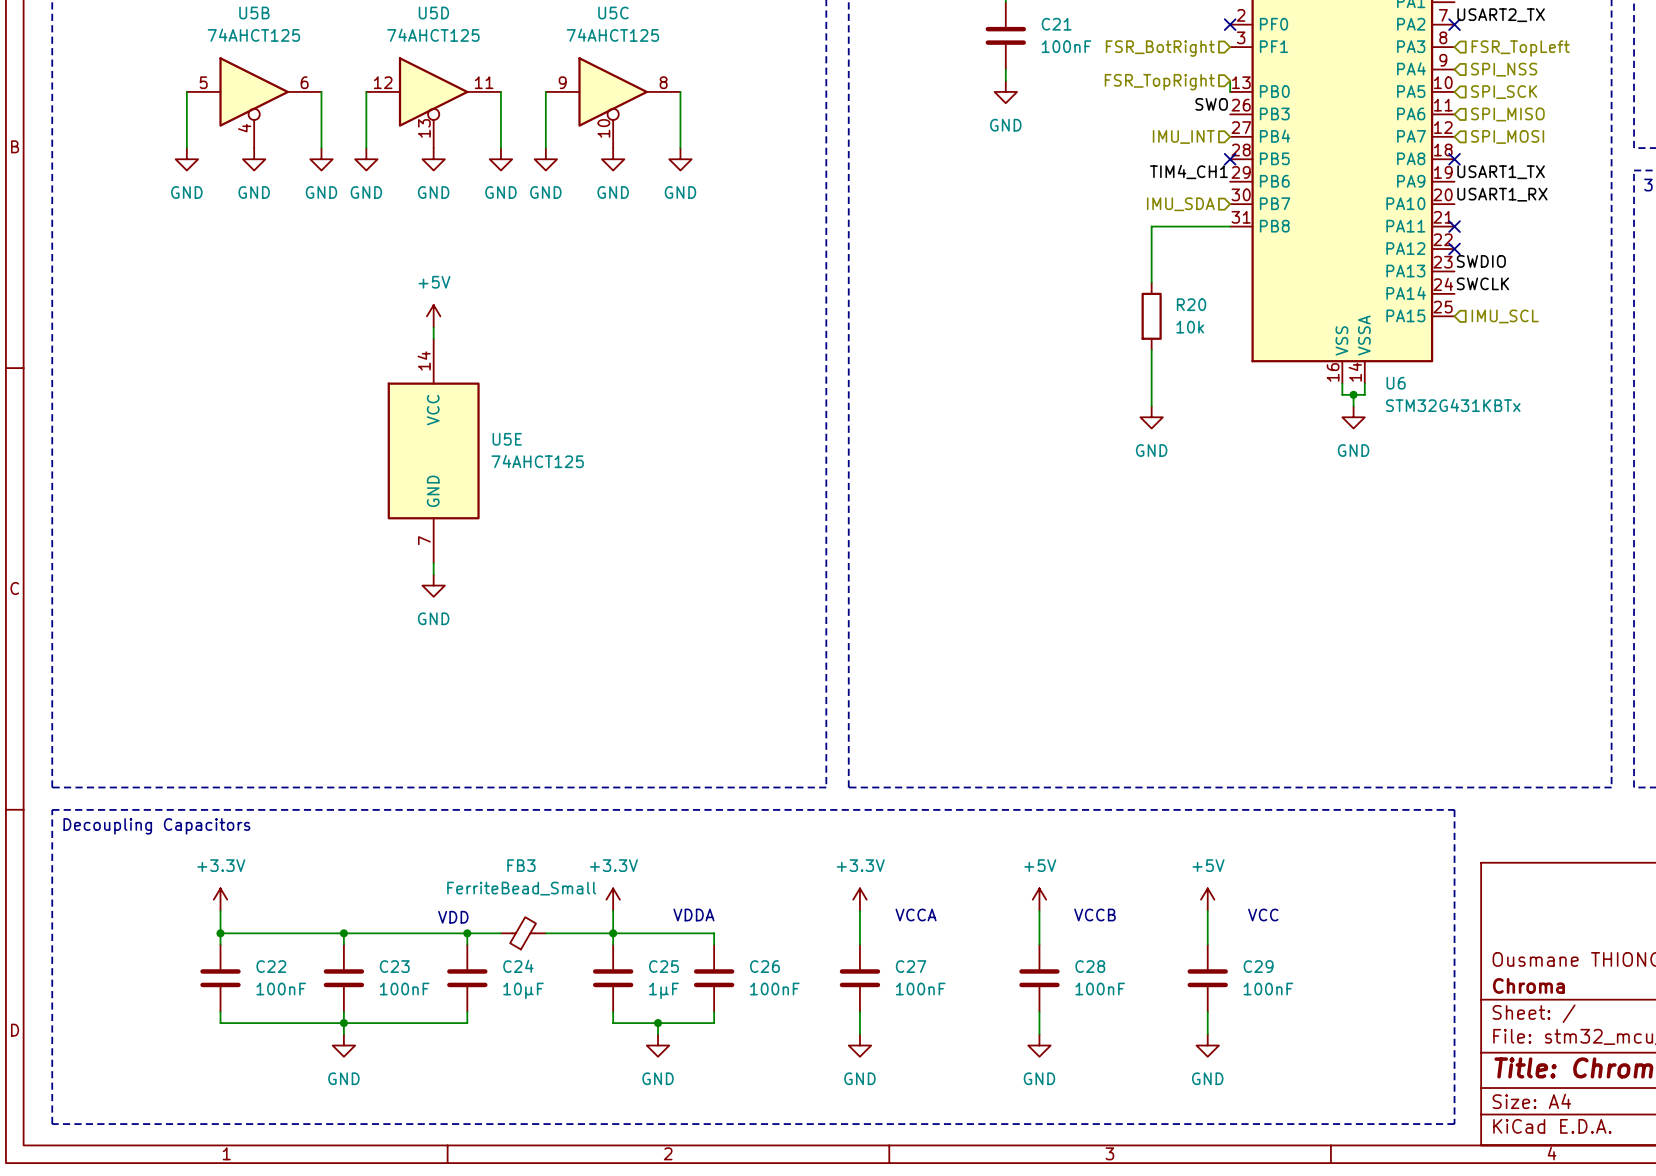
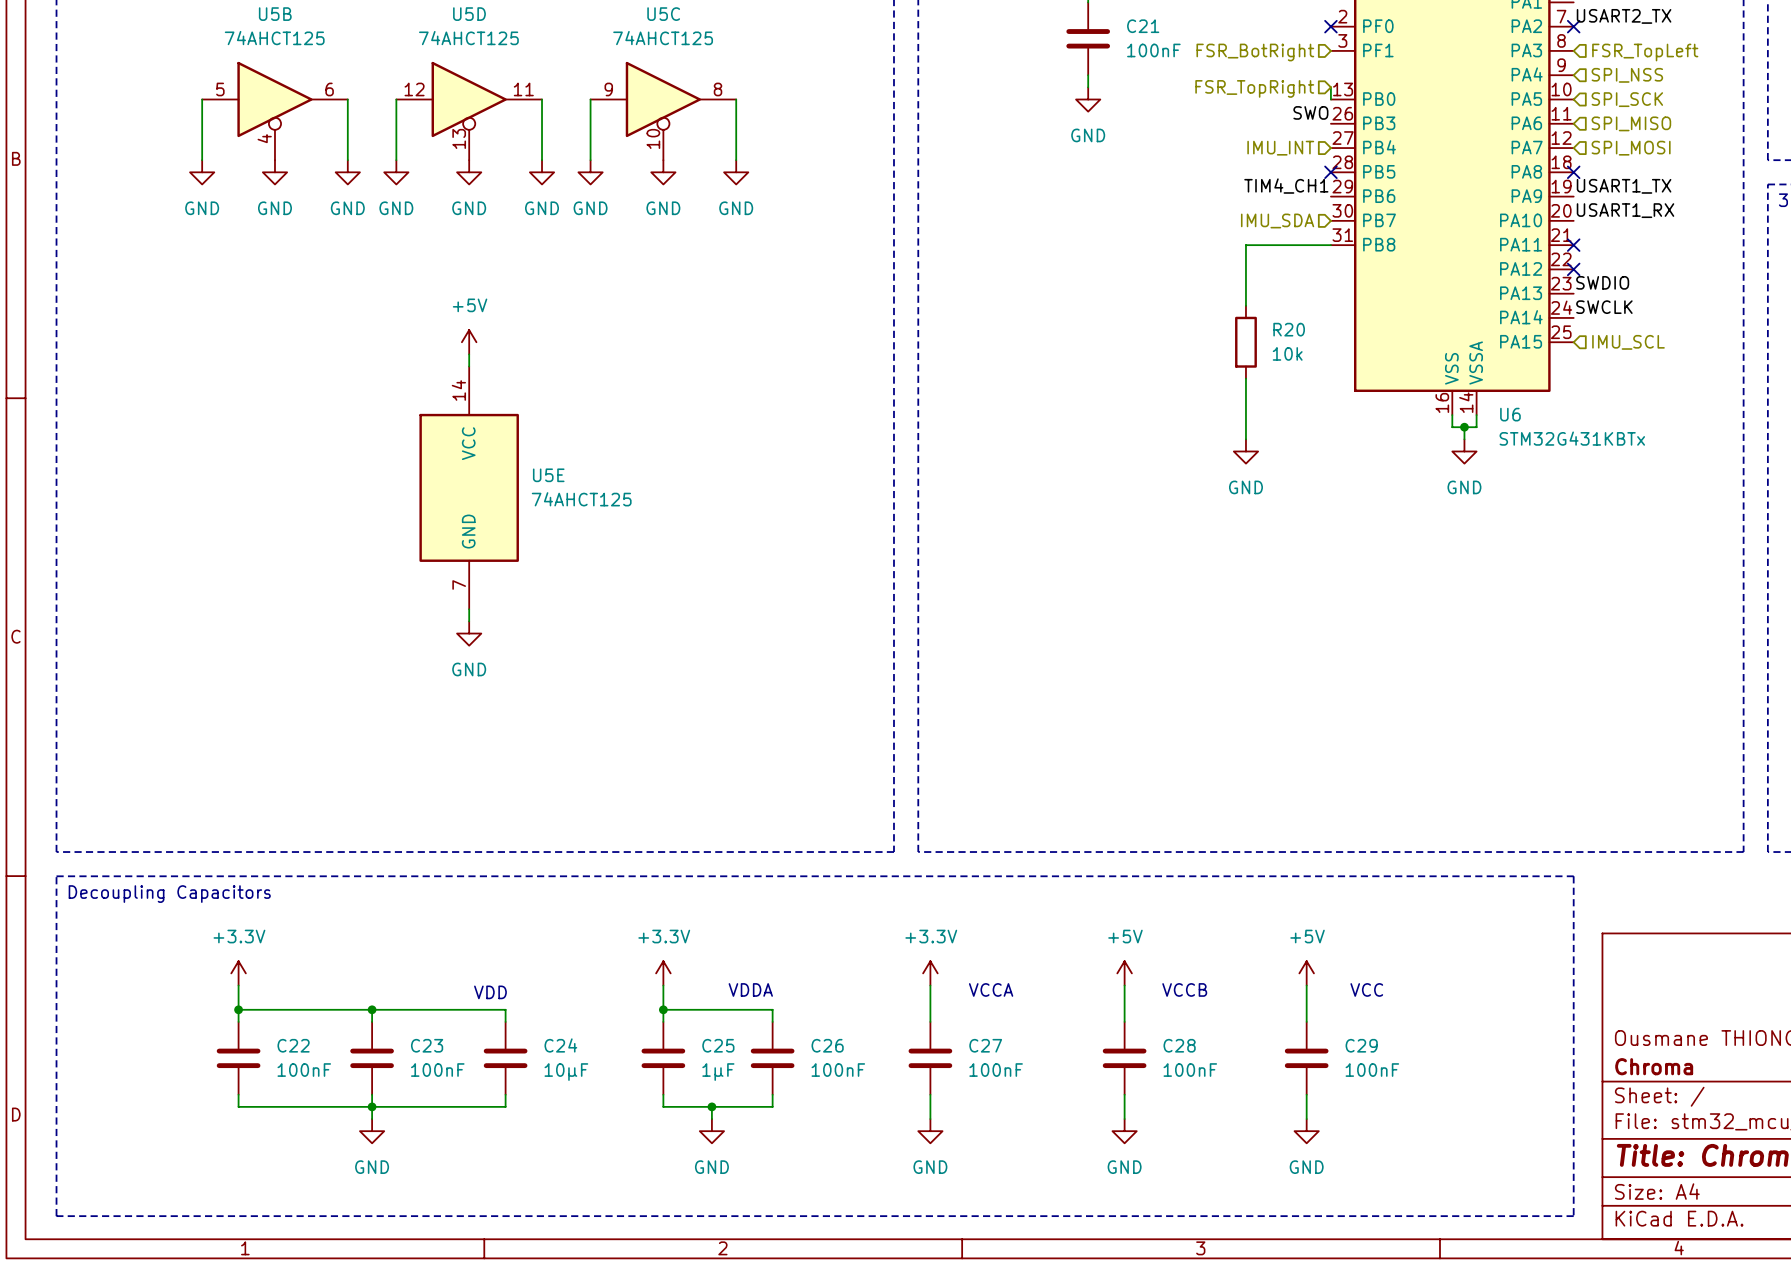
wire: (467, 933) (500, 933) -> none
junction: (467, 933) -> none
FB3: FerriteBead_Small (523, 933) -> none
wire: (545, 933) (613, 933) -> none

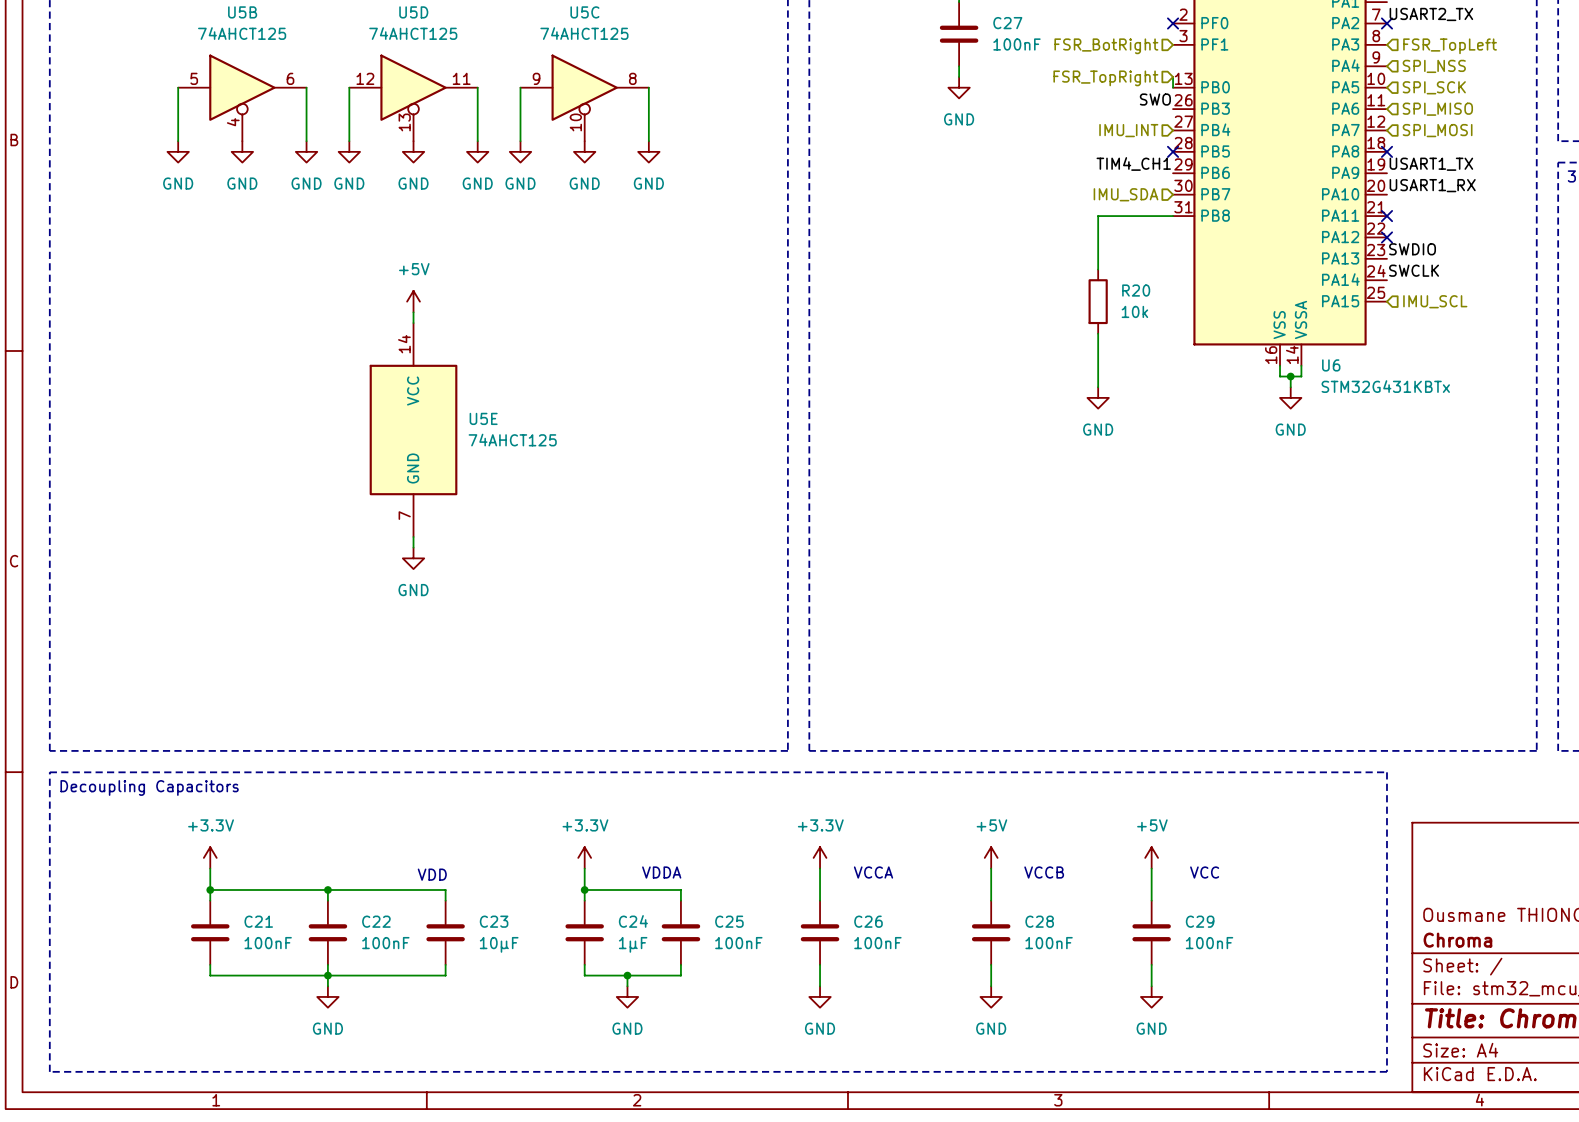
C21 name: C21 (1143, 26) -> C27 (1007, 23)
C22 name: C22 (293, 1045) -> C21 (258, 921)
C23 name: C23 (427, 1045) -> C22 (376, 921)
C24 name: C24 (560, 1045) -> C23 (494, 921)
C25 name: C25 (718, 1045) -> C24 (633, 921)
C26 name: C26 (827, 1045) -> C25 (729, 921)
C27 name: C27 (985, 1045) -> C26 (868, 921)

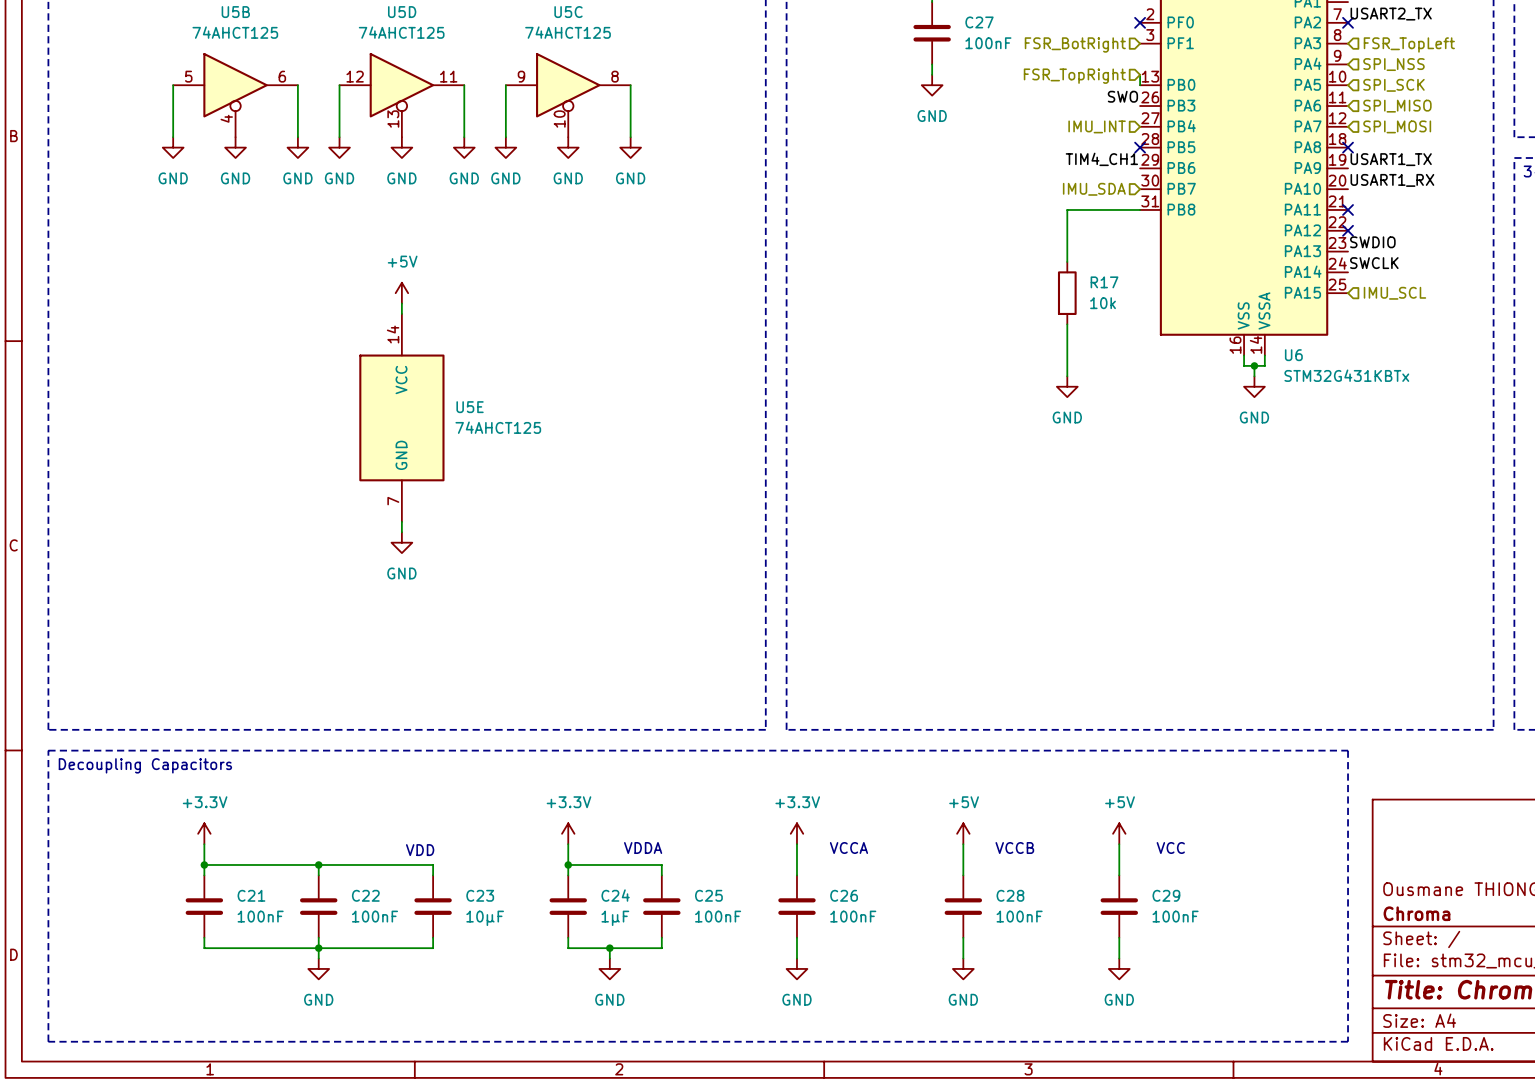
R20 name: R20 (1136, 290) -> R17 (1104, 282)

